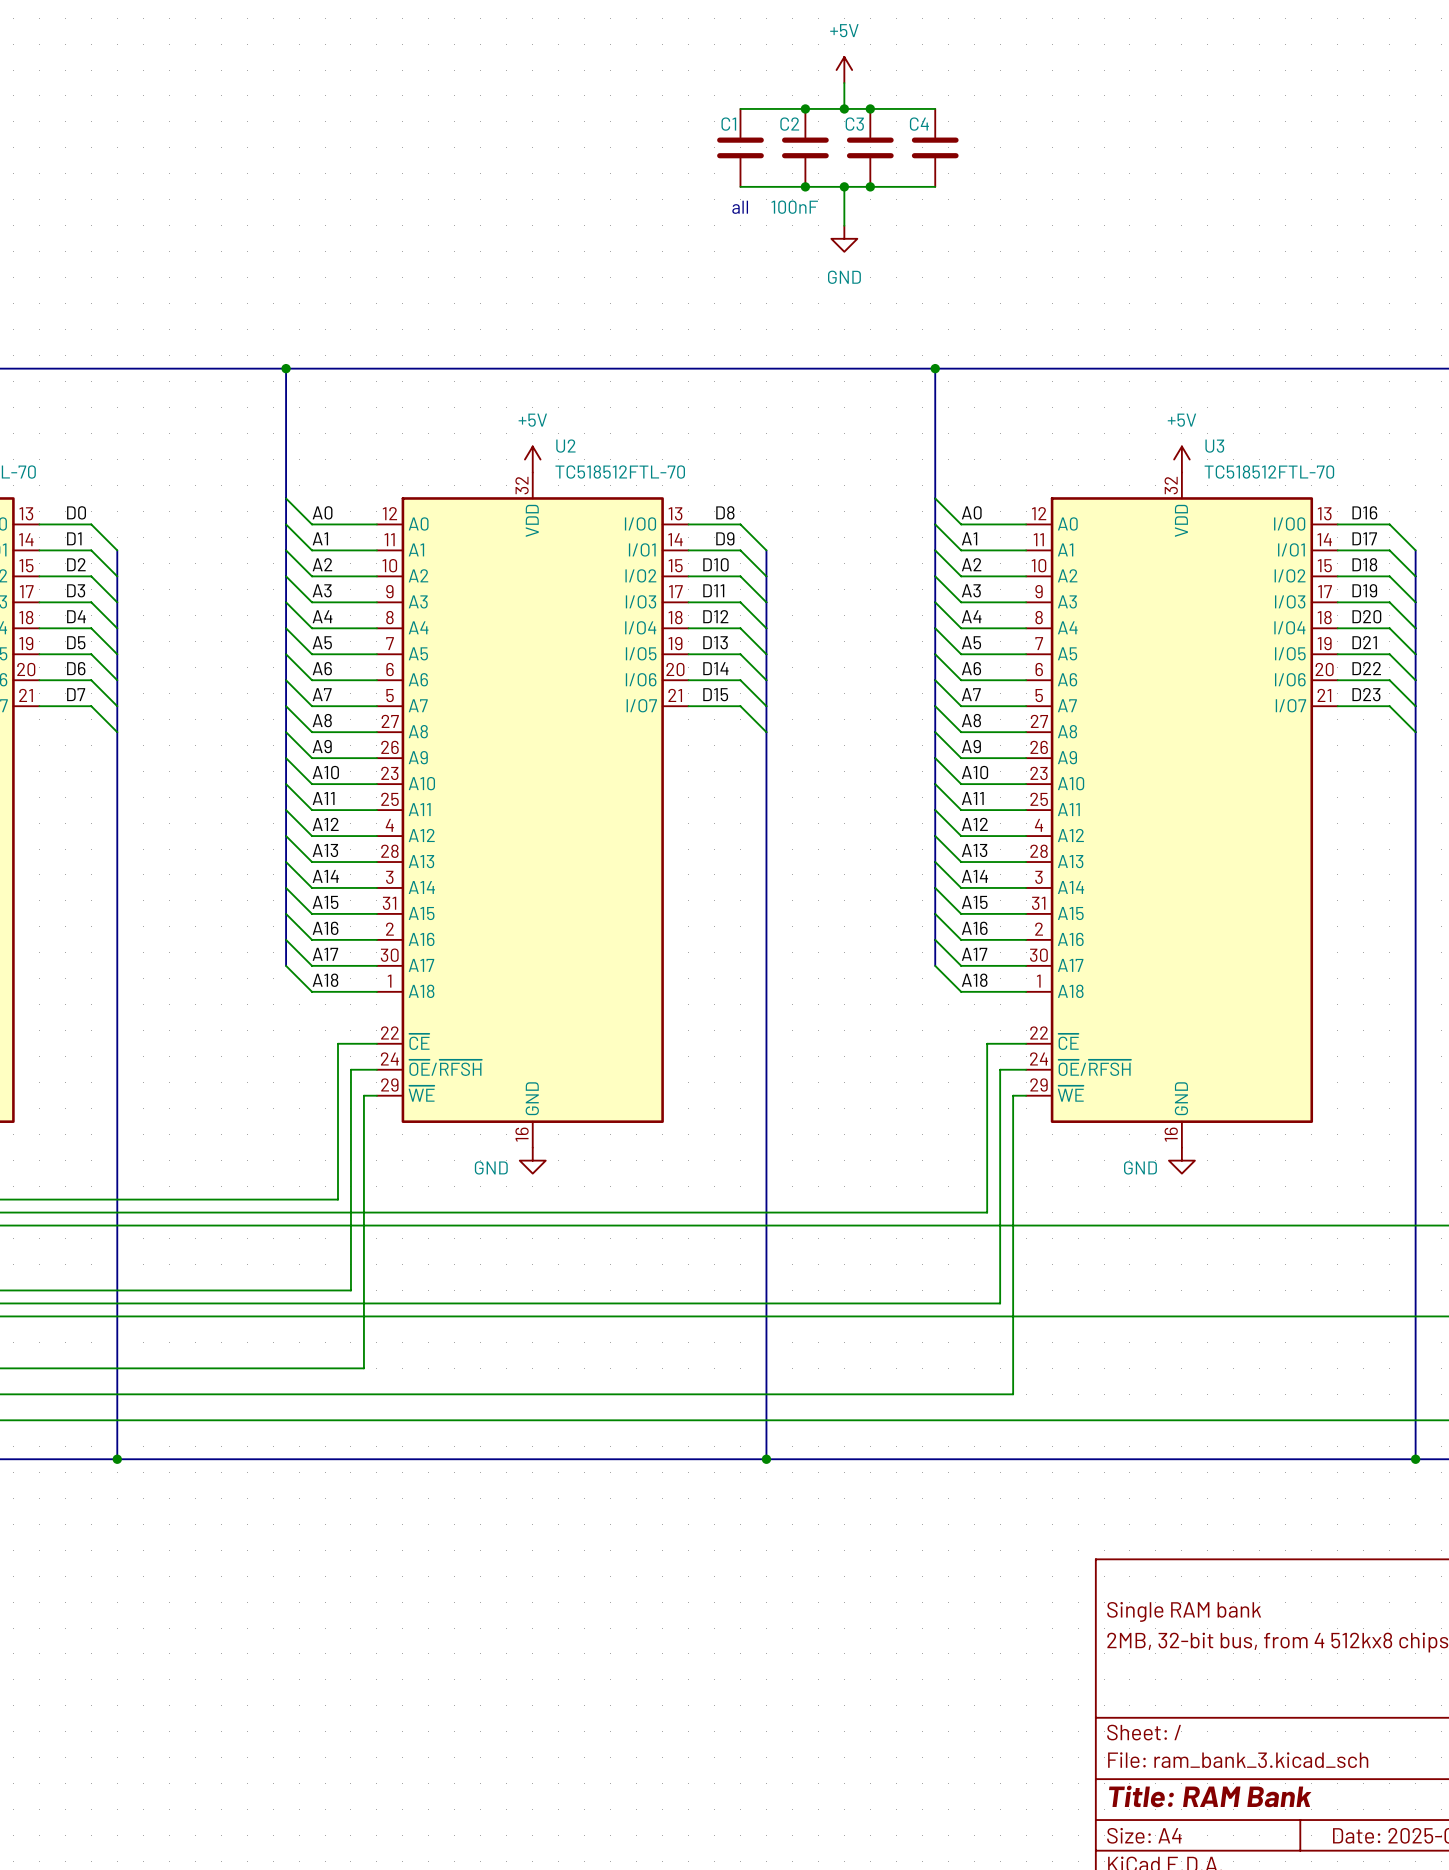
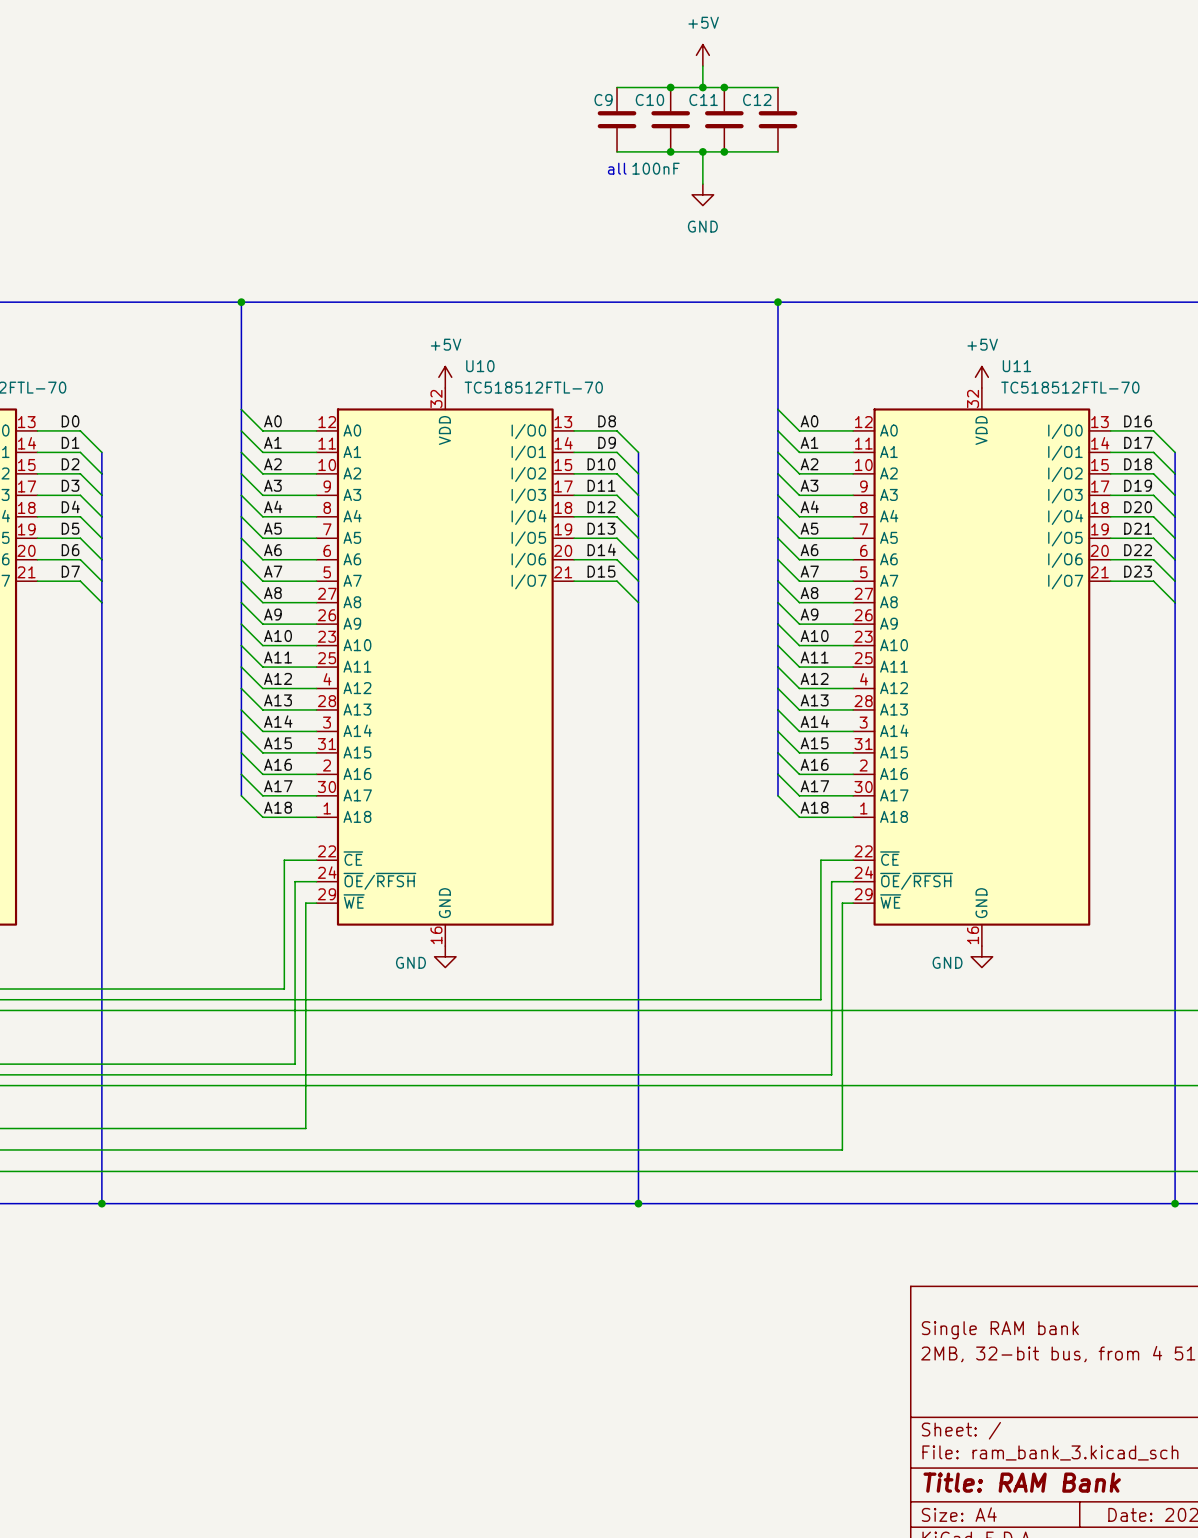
C1 name: C1 (728, 124) -> C9 (603, 100)
C2 name: C2 (789, 124) -> C10 (649, 100)
C3 name: C3 (854, 124) -> C11 (703, 100)
C4 name: C4 (919, 124) -> C12 (757, 100)
U2 name: U2 (565, 446) -> U10 (480, 366)
U3 name: U3 (1214, 446) -> U11 (1016, 366)

